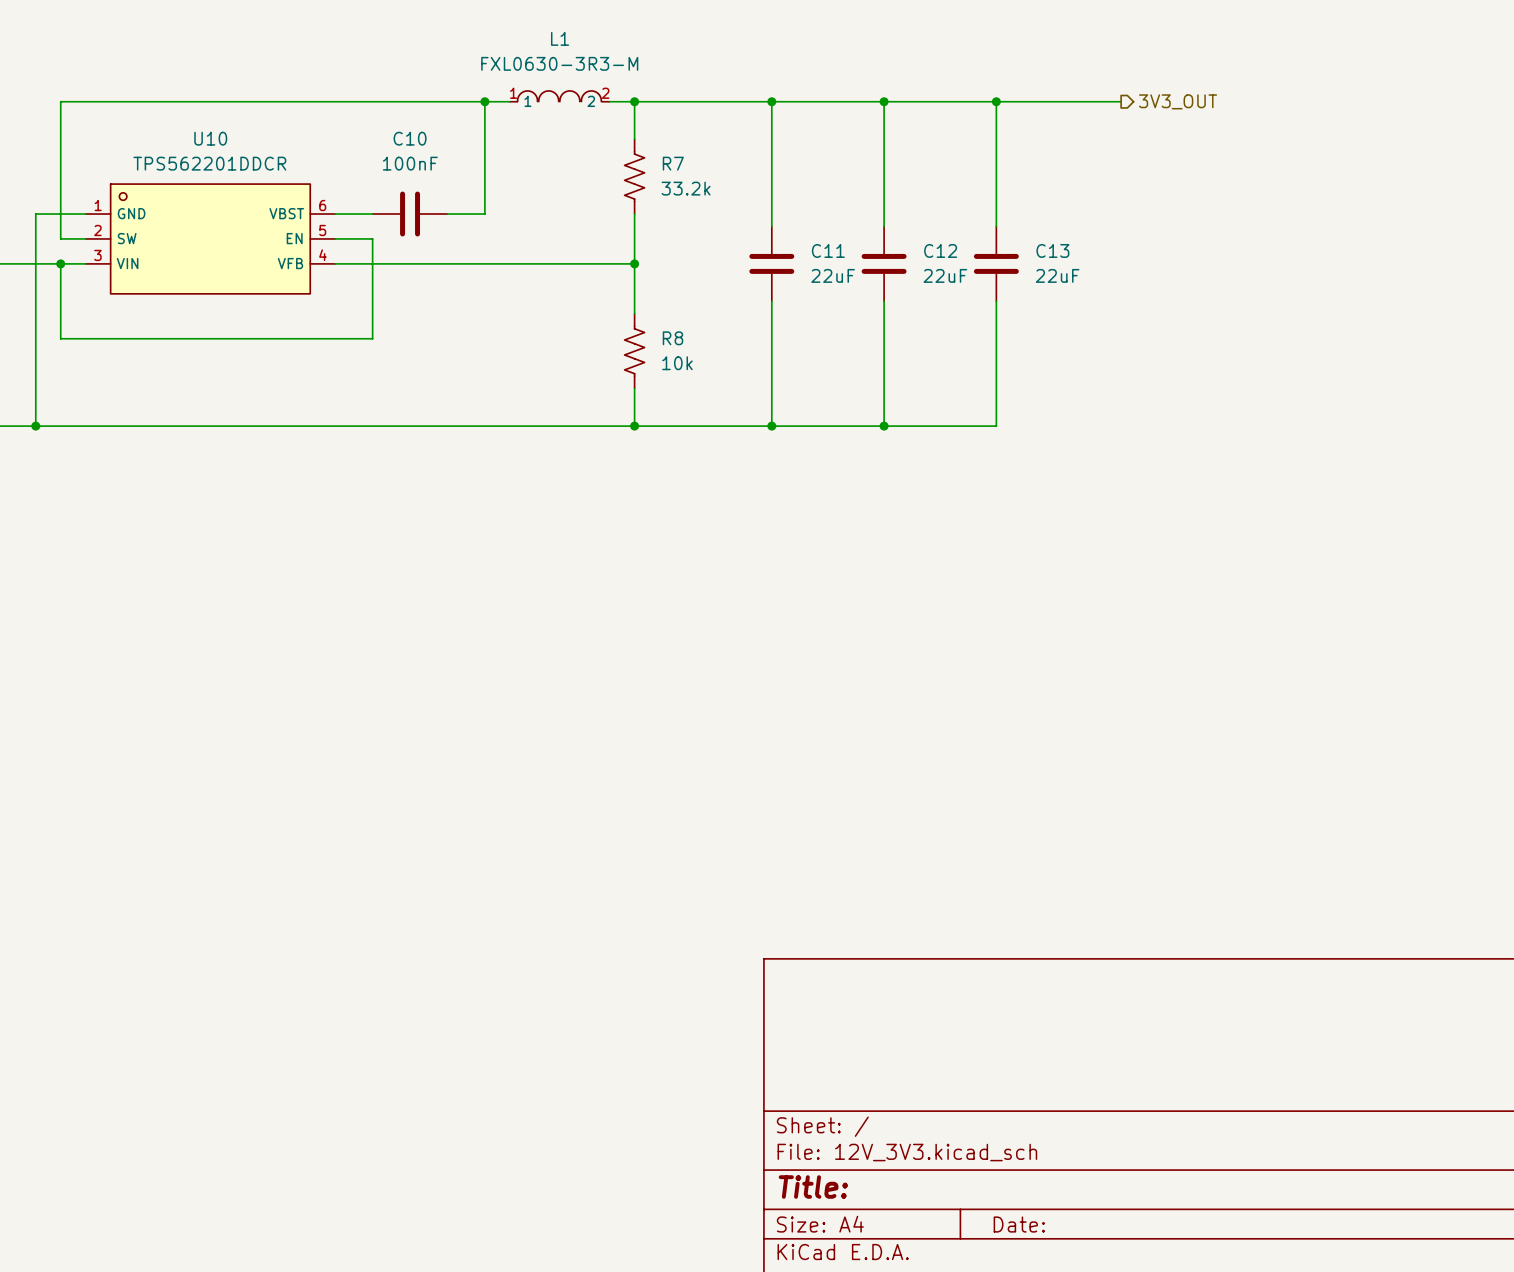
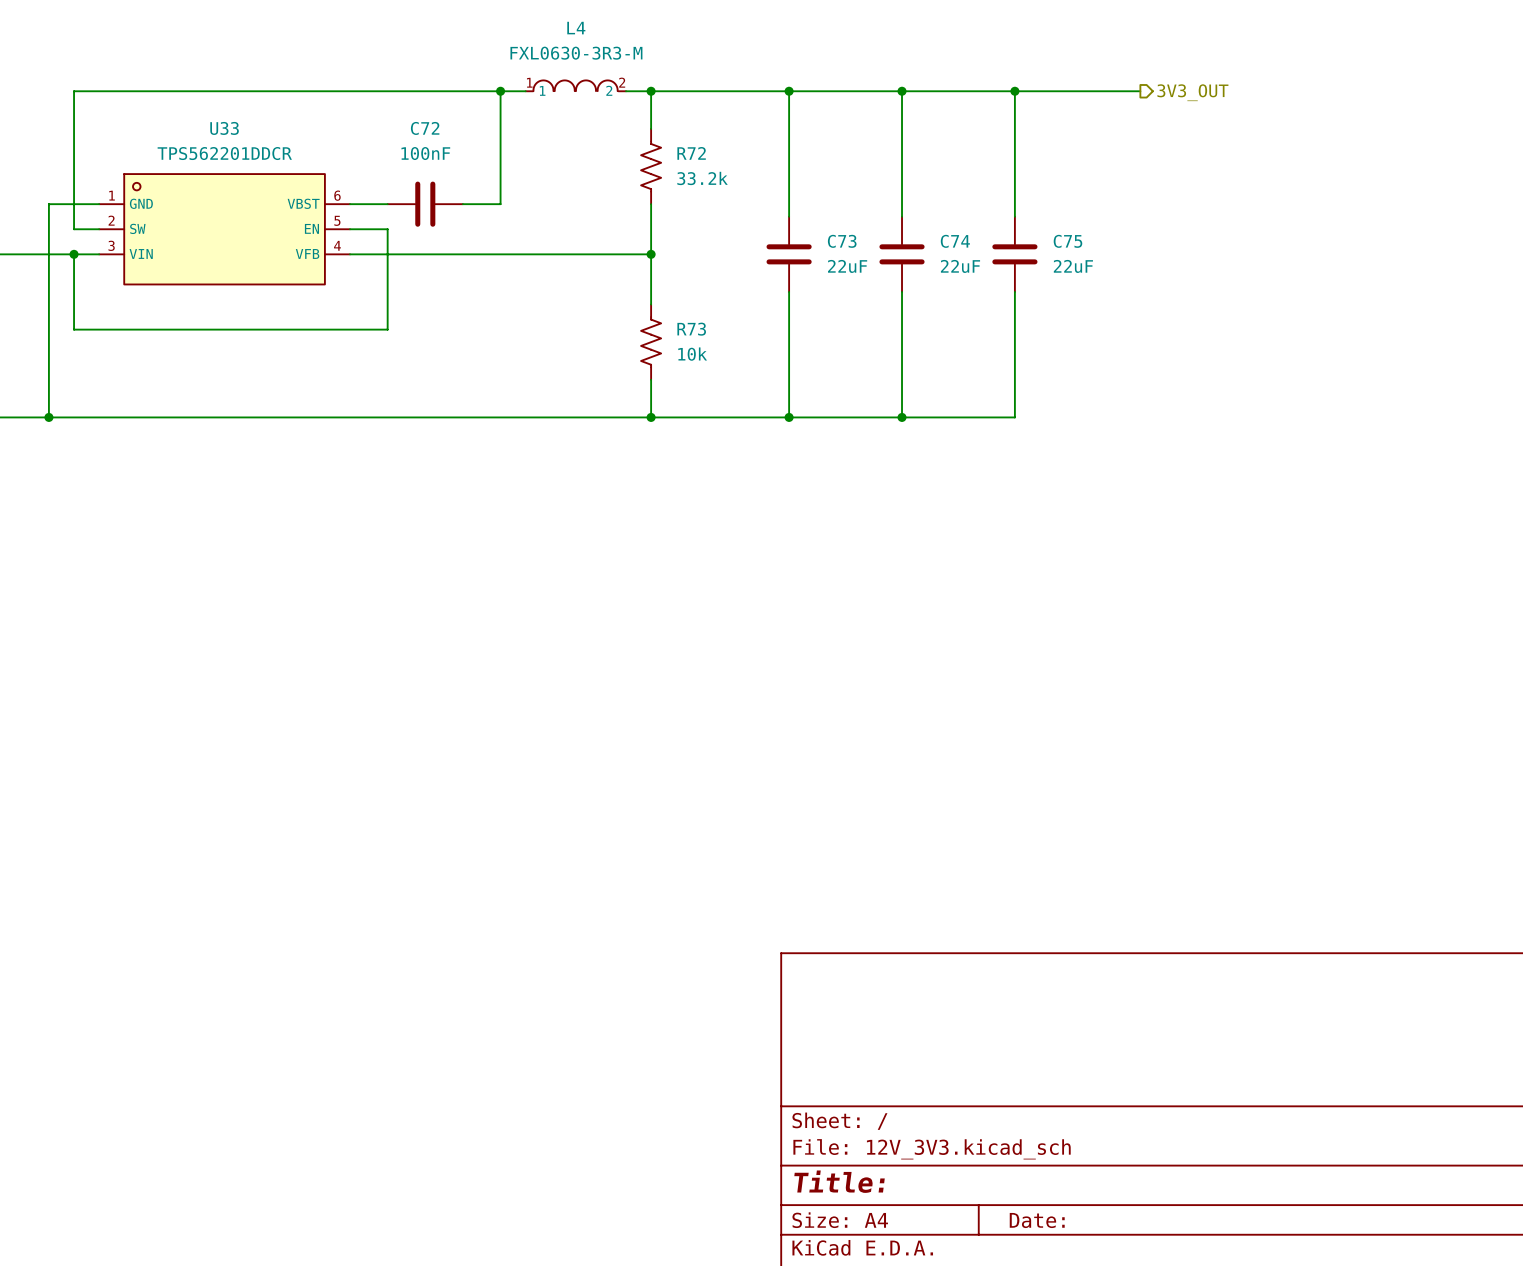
L1 name: L1 (560, 38) -> L4 (576, 28)
U10 name: U10 (210, 138) -> U33 (224, 128)
C10 name: C10 (410, 138) -> C72 (425, 128)
R7 name: R7 (673, 163) -> R72 (691, 153)
C11 name: C11 (828, 250) -> C73 (842, 241)
C12 name: C12 (940, 250) -> C74 (955, 241)
C13 name: C13 (1052, 250) -> C75 (1067, 241)
R8 name: R8 (673, 338) -> R73 (691, 329)

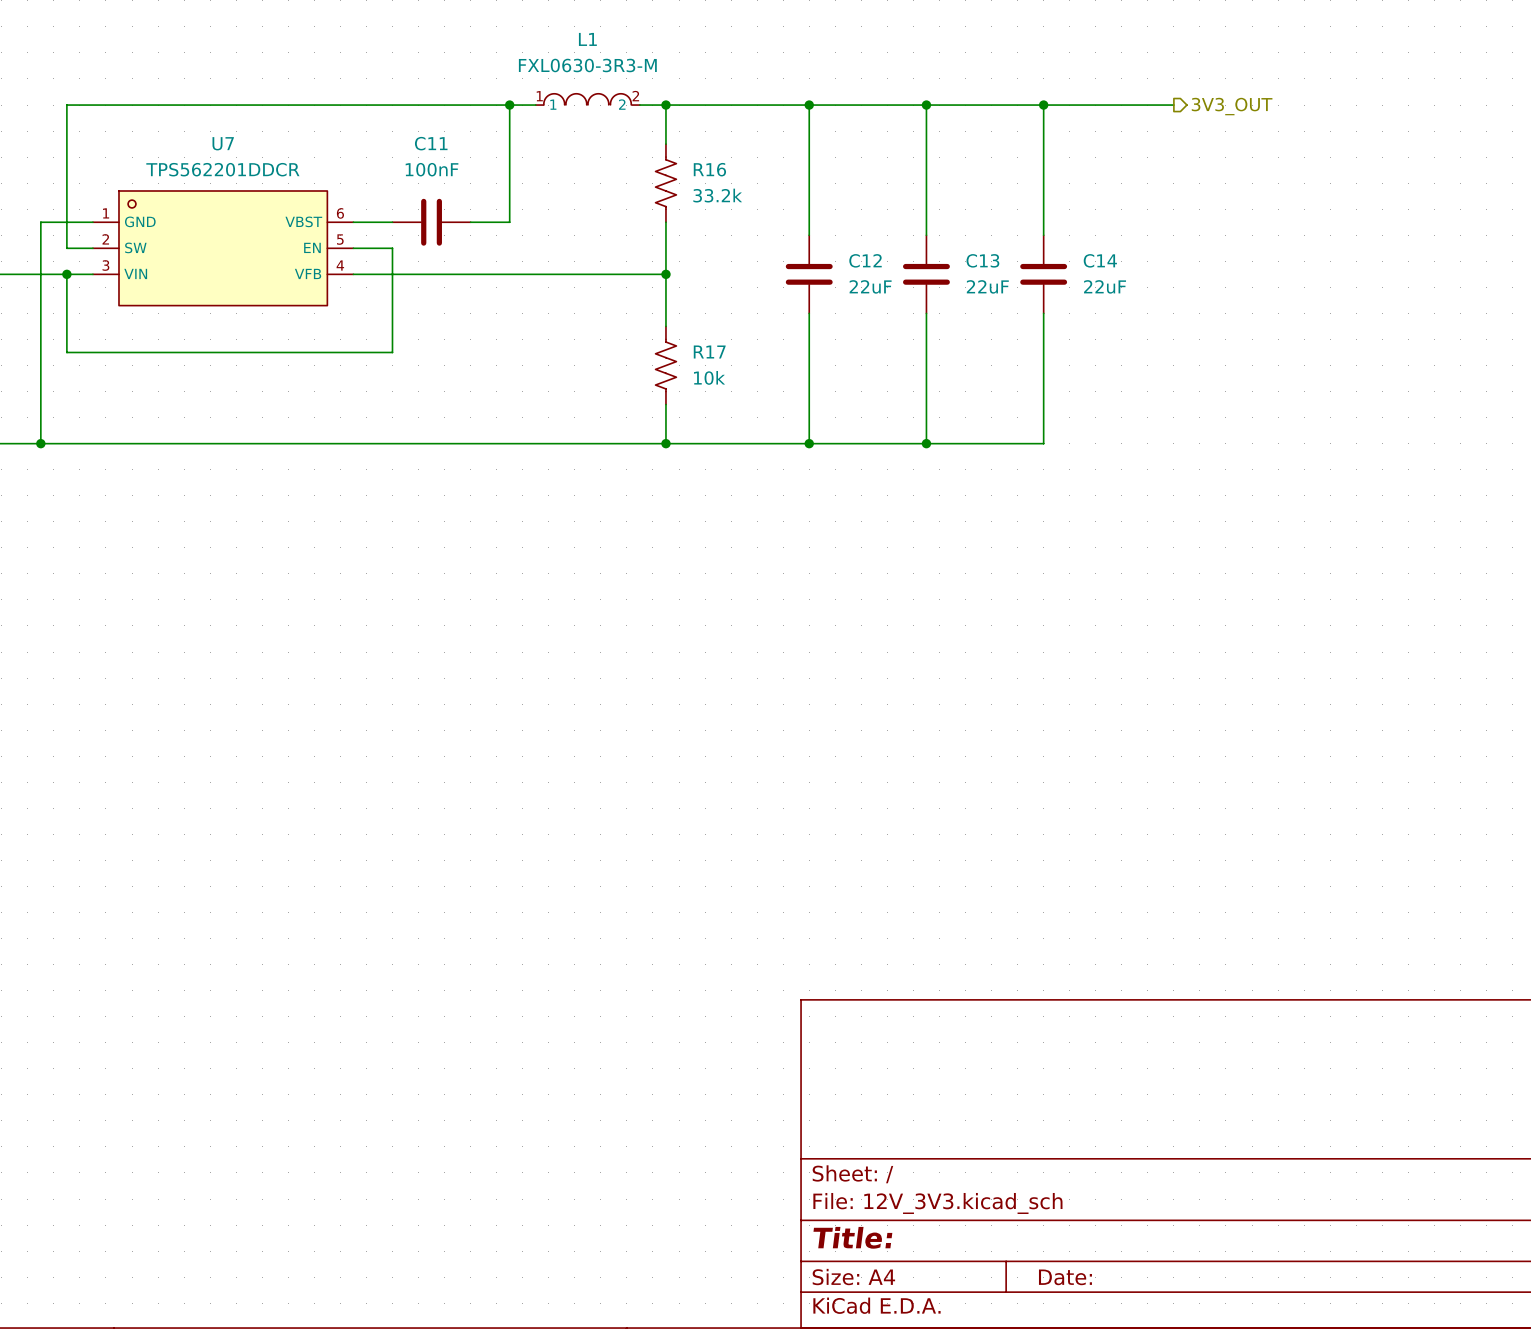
L4 name: L4 (576, 28) -> L1 (587, 39)
U33 name: U33 (224, 128) -> U7 (223, 143)
C72 name: C72 (425, 128) -> C11 (431, 143)
R72 name: R72 (691, 153) -> R16 (709, 169)
C73 name: C73 (842, 241) -> C12 (865, 260)
C74 name: C74 (955, 241) -> C13 (982, 260)
C75 name: C75 (1067, 241) -> C14 (1100, 260)
R73 name: R73 (691, 329) -> R17 (709, 352)

